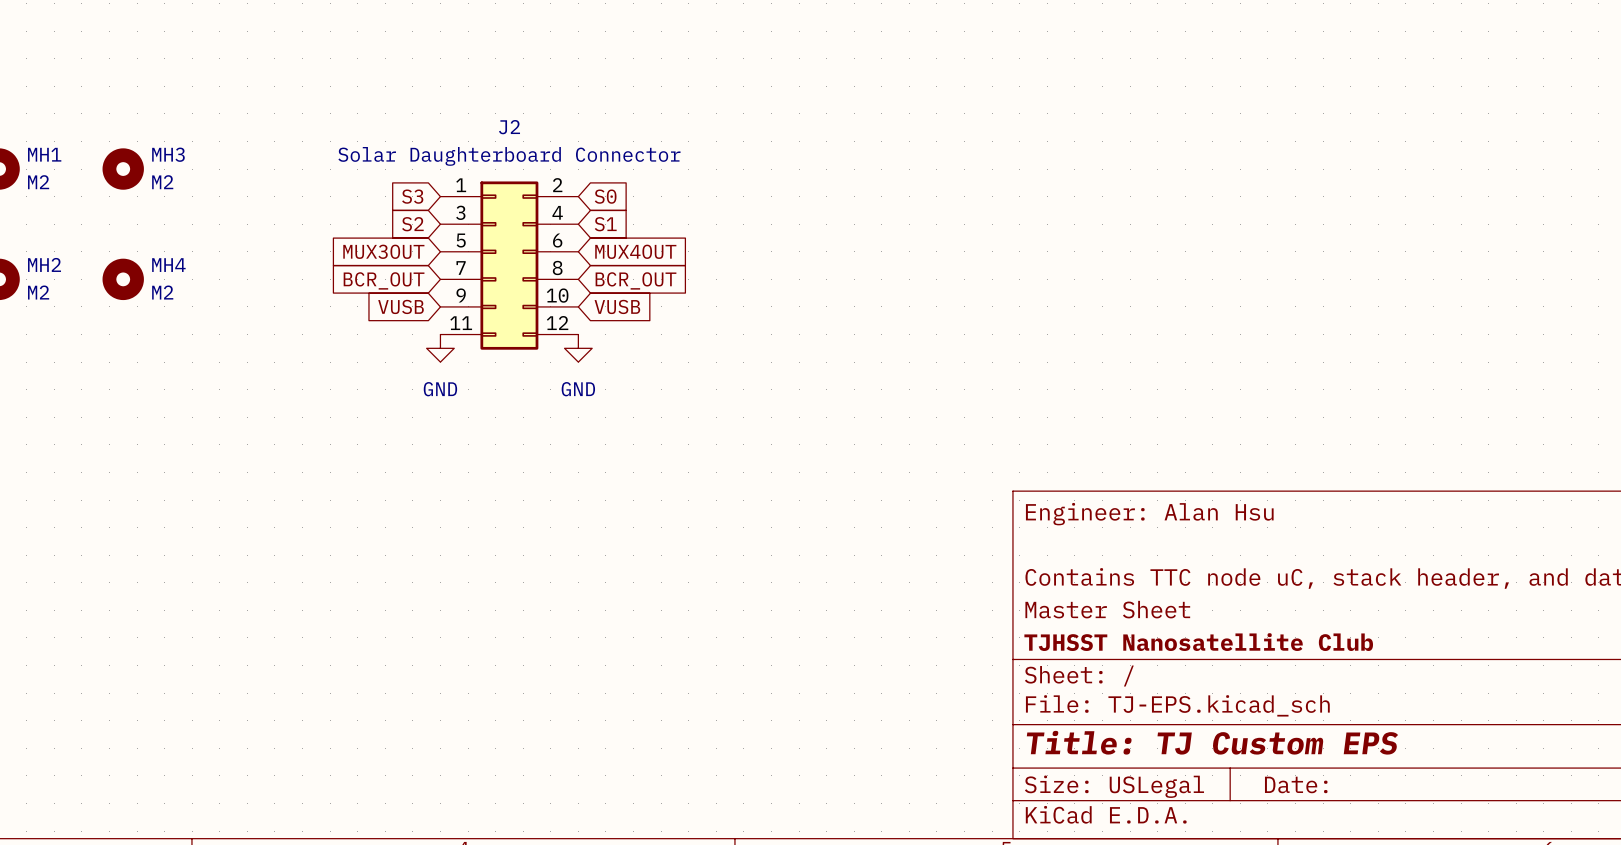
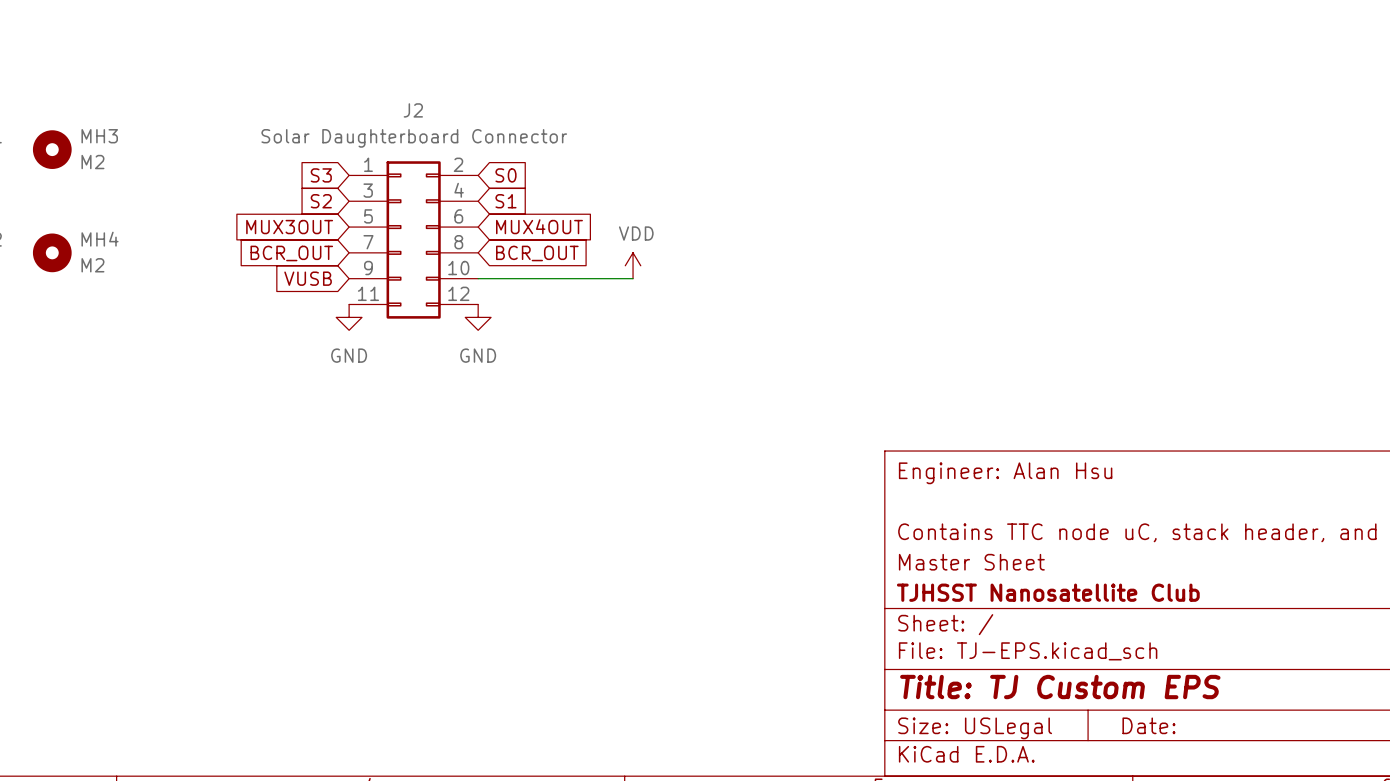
power symbol: none -> VDD (633, 265)
wire: none -> (478, 278) (633, 278)
global label: VUSB (617, 306) -> none

